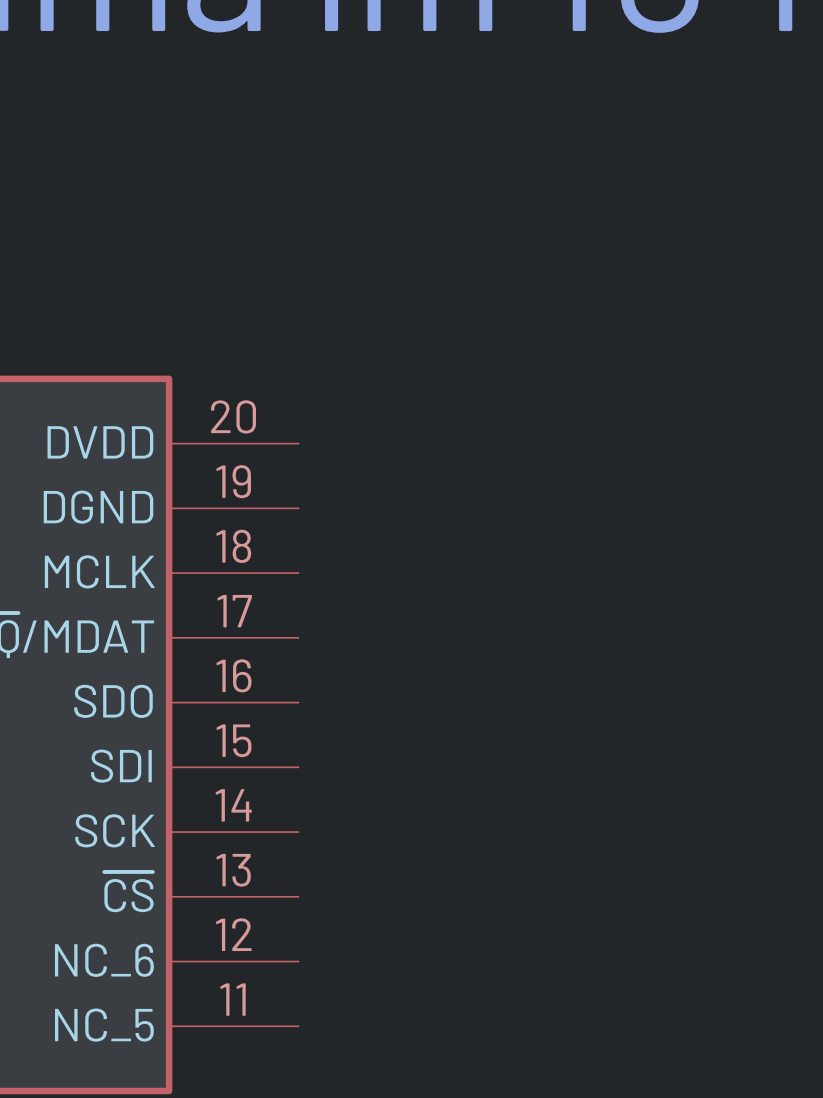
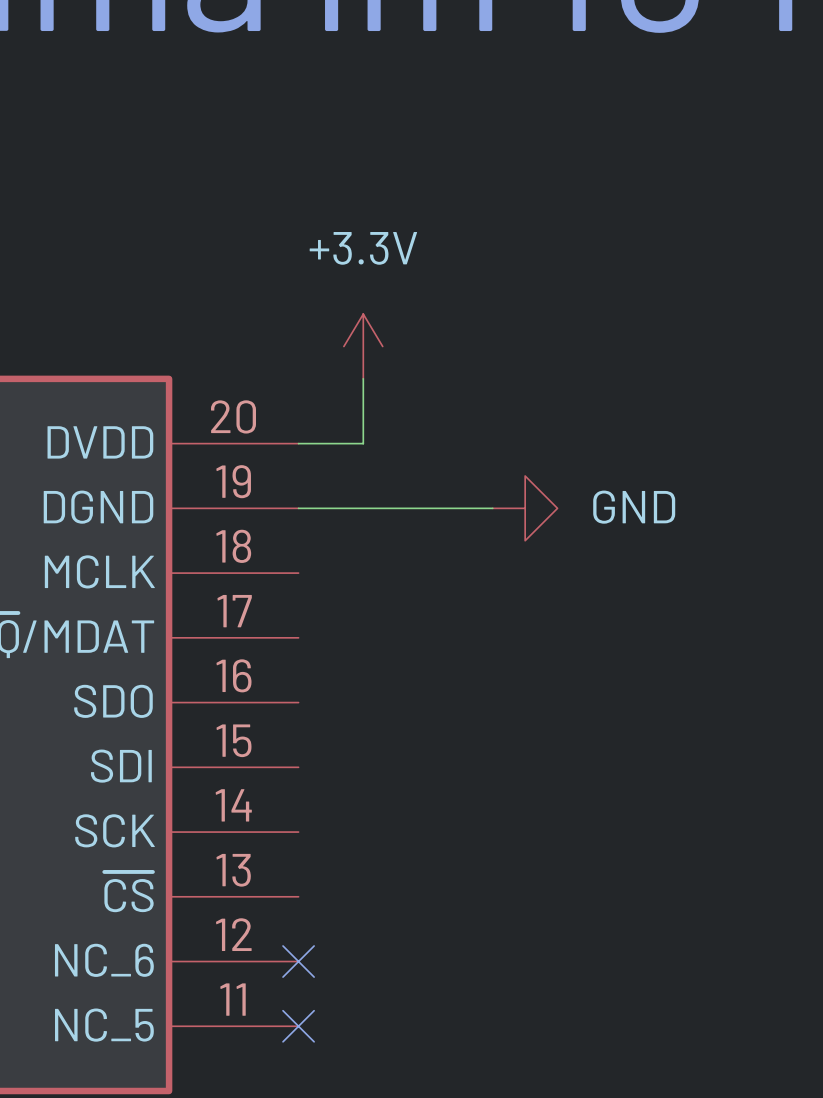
power symbol: none -> +3.3V (363, 346)
wire: none -> (363, 378) (363, 443) (298, 443)
wire: none -> (298, 508) (492, 508)
power symbol: none -> GND (525, 508)
no-connect mark: none -> (298, 961)
no-connect mark: none -> (298, 1026)

